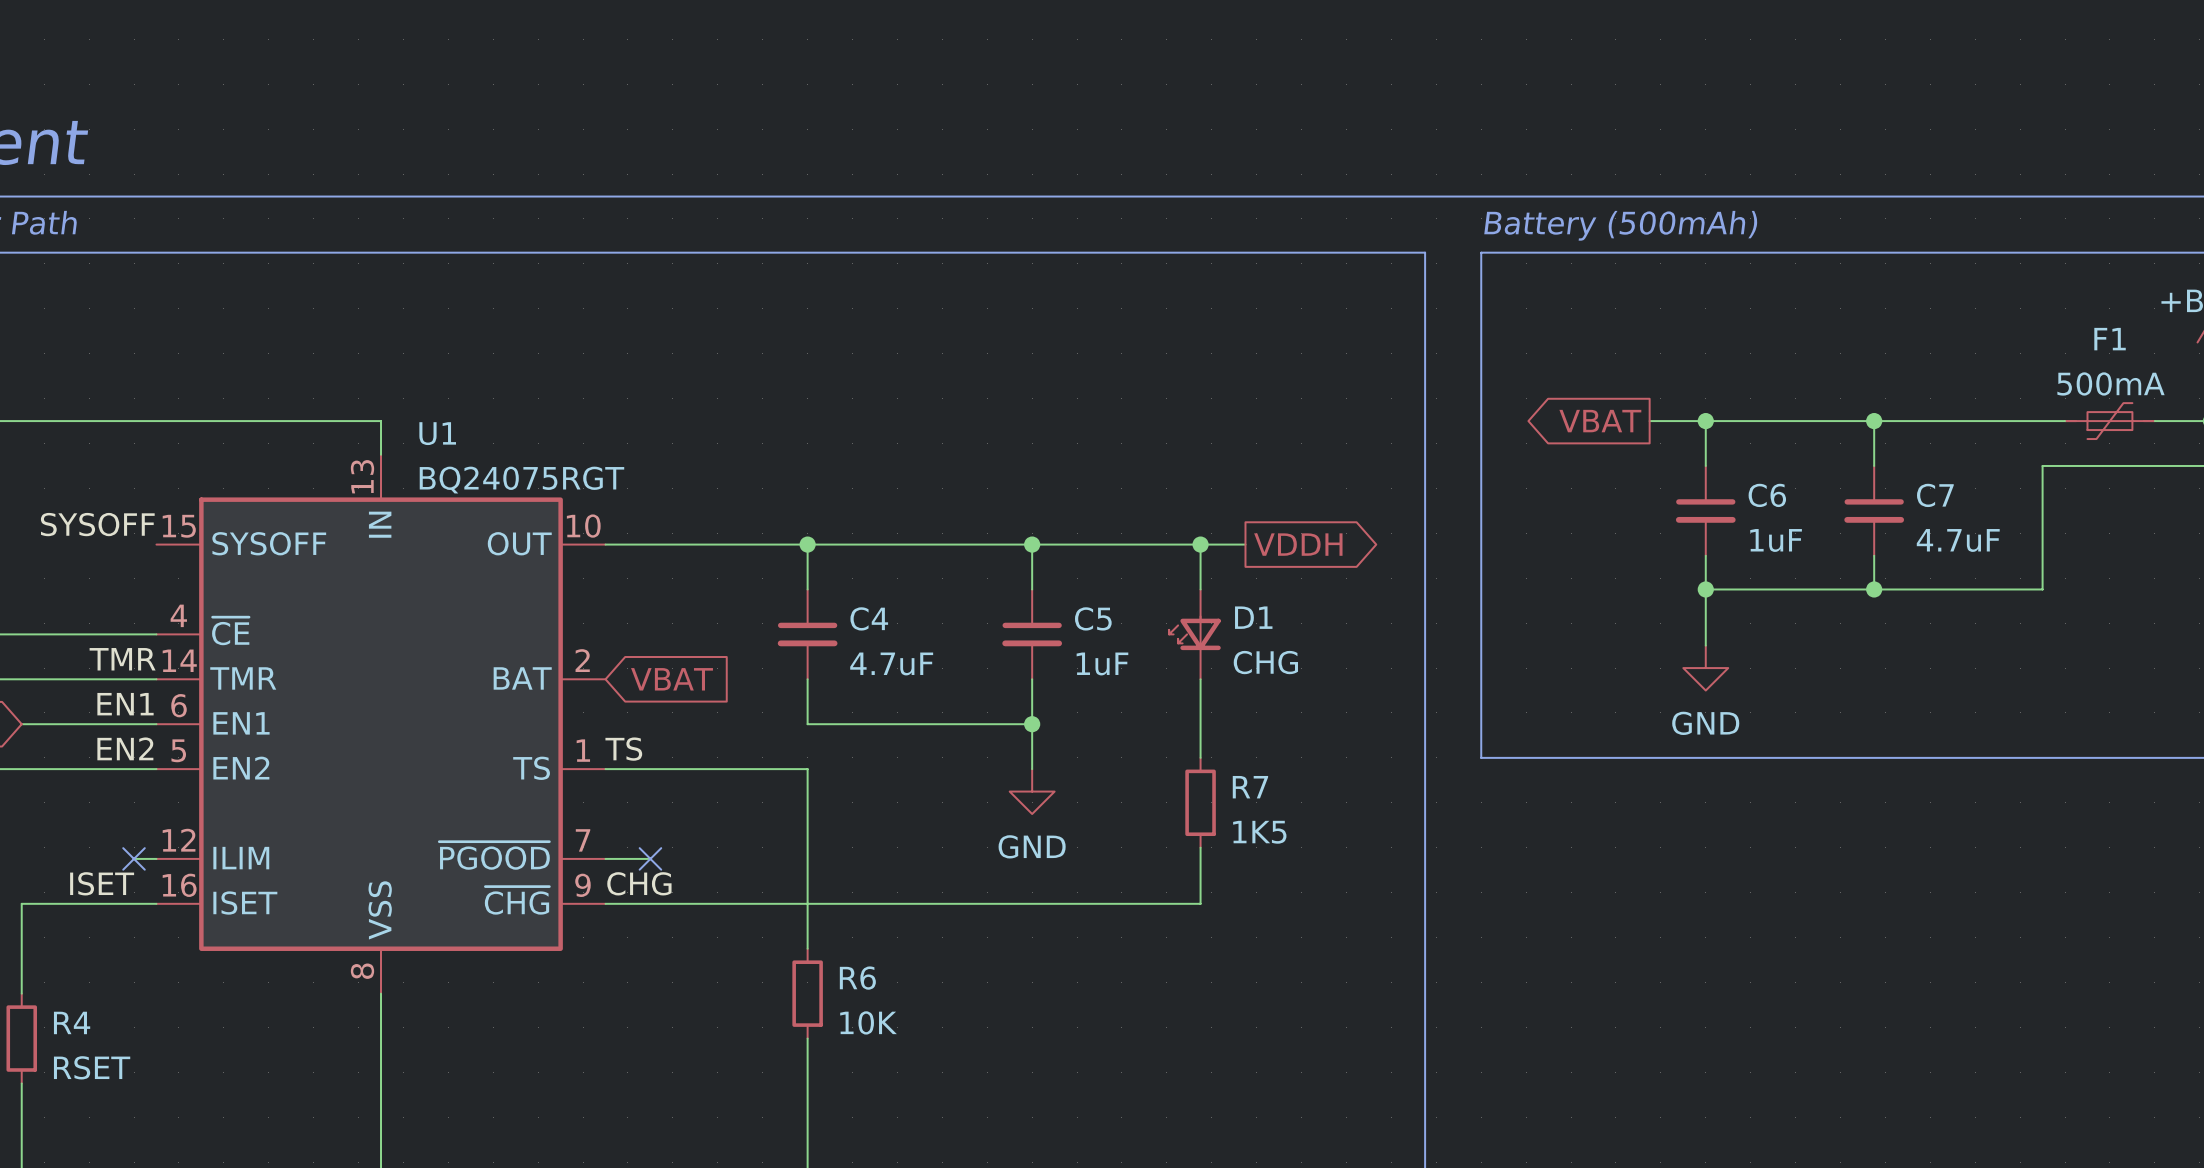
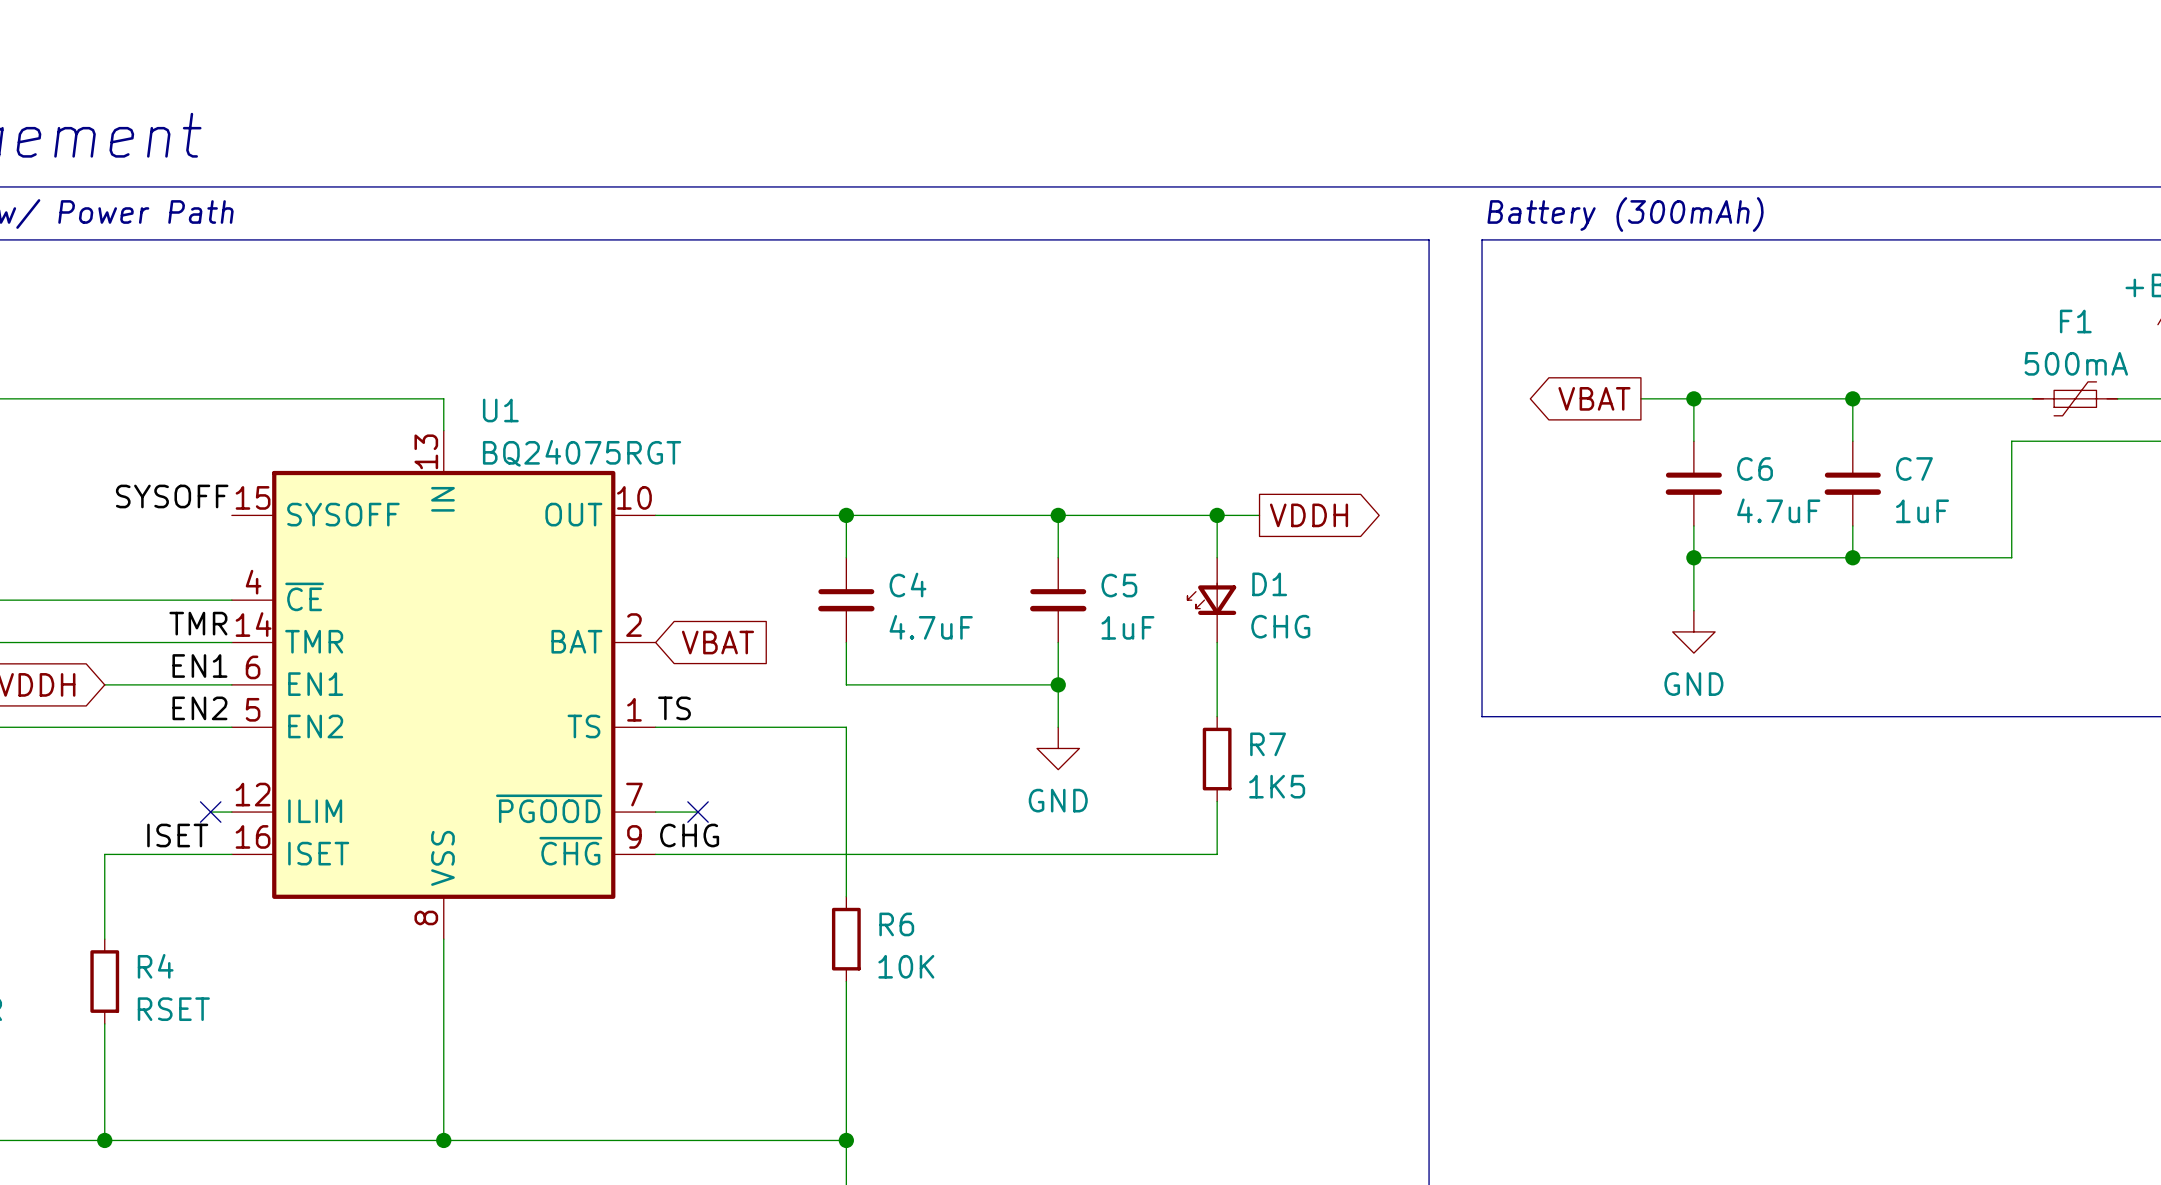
text: Battery (500mAh) (1620, 225) -> Battery (300mAh) (1625, 214)
C6 value: 1uF (1776, 540) -> 4.7uF (1778, 510)
C7 value: 4.7uF (1958, 540) -> 1uF (1922, 511)

